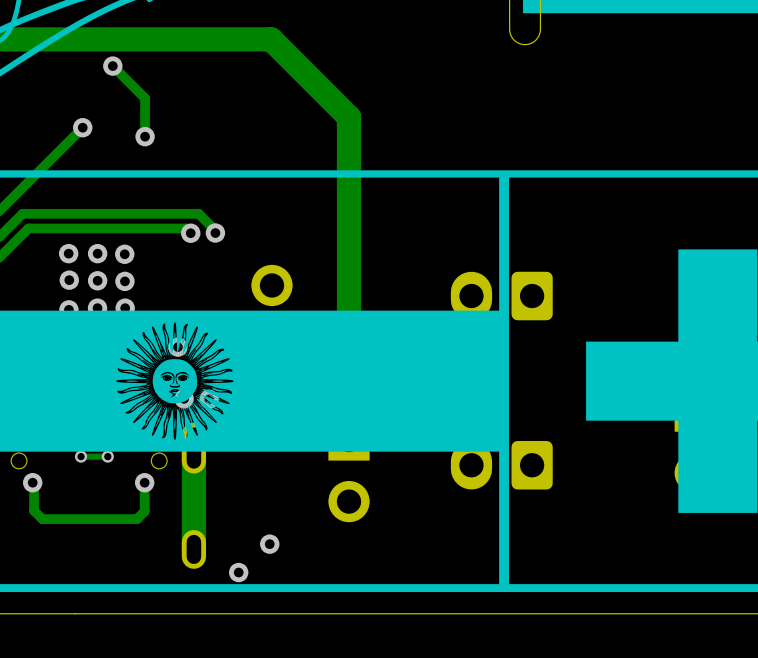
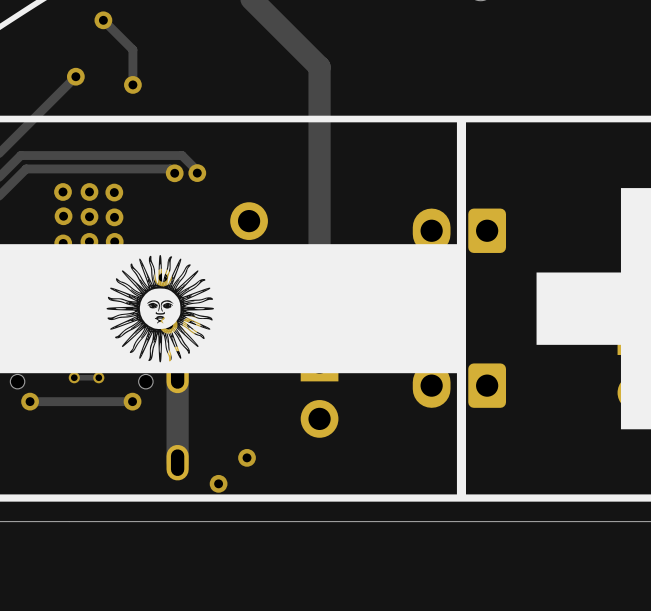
track: (144, 482) (144, 511) (136, 519) (42, 519) (34, 510) (34, 482) -> (132, 401) (31, 401)

